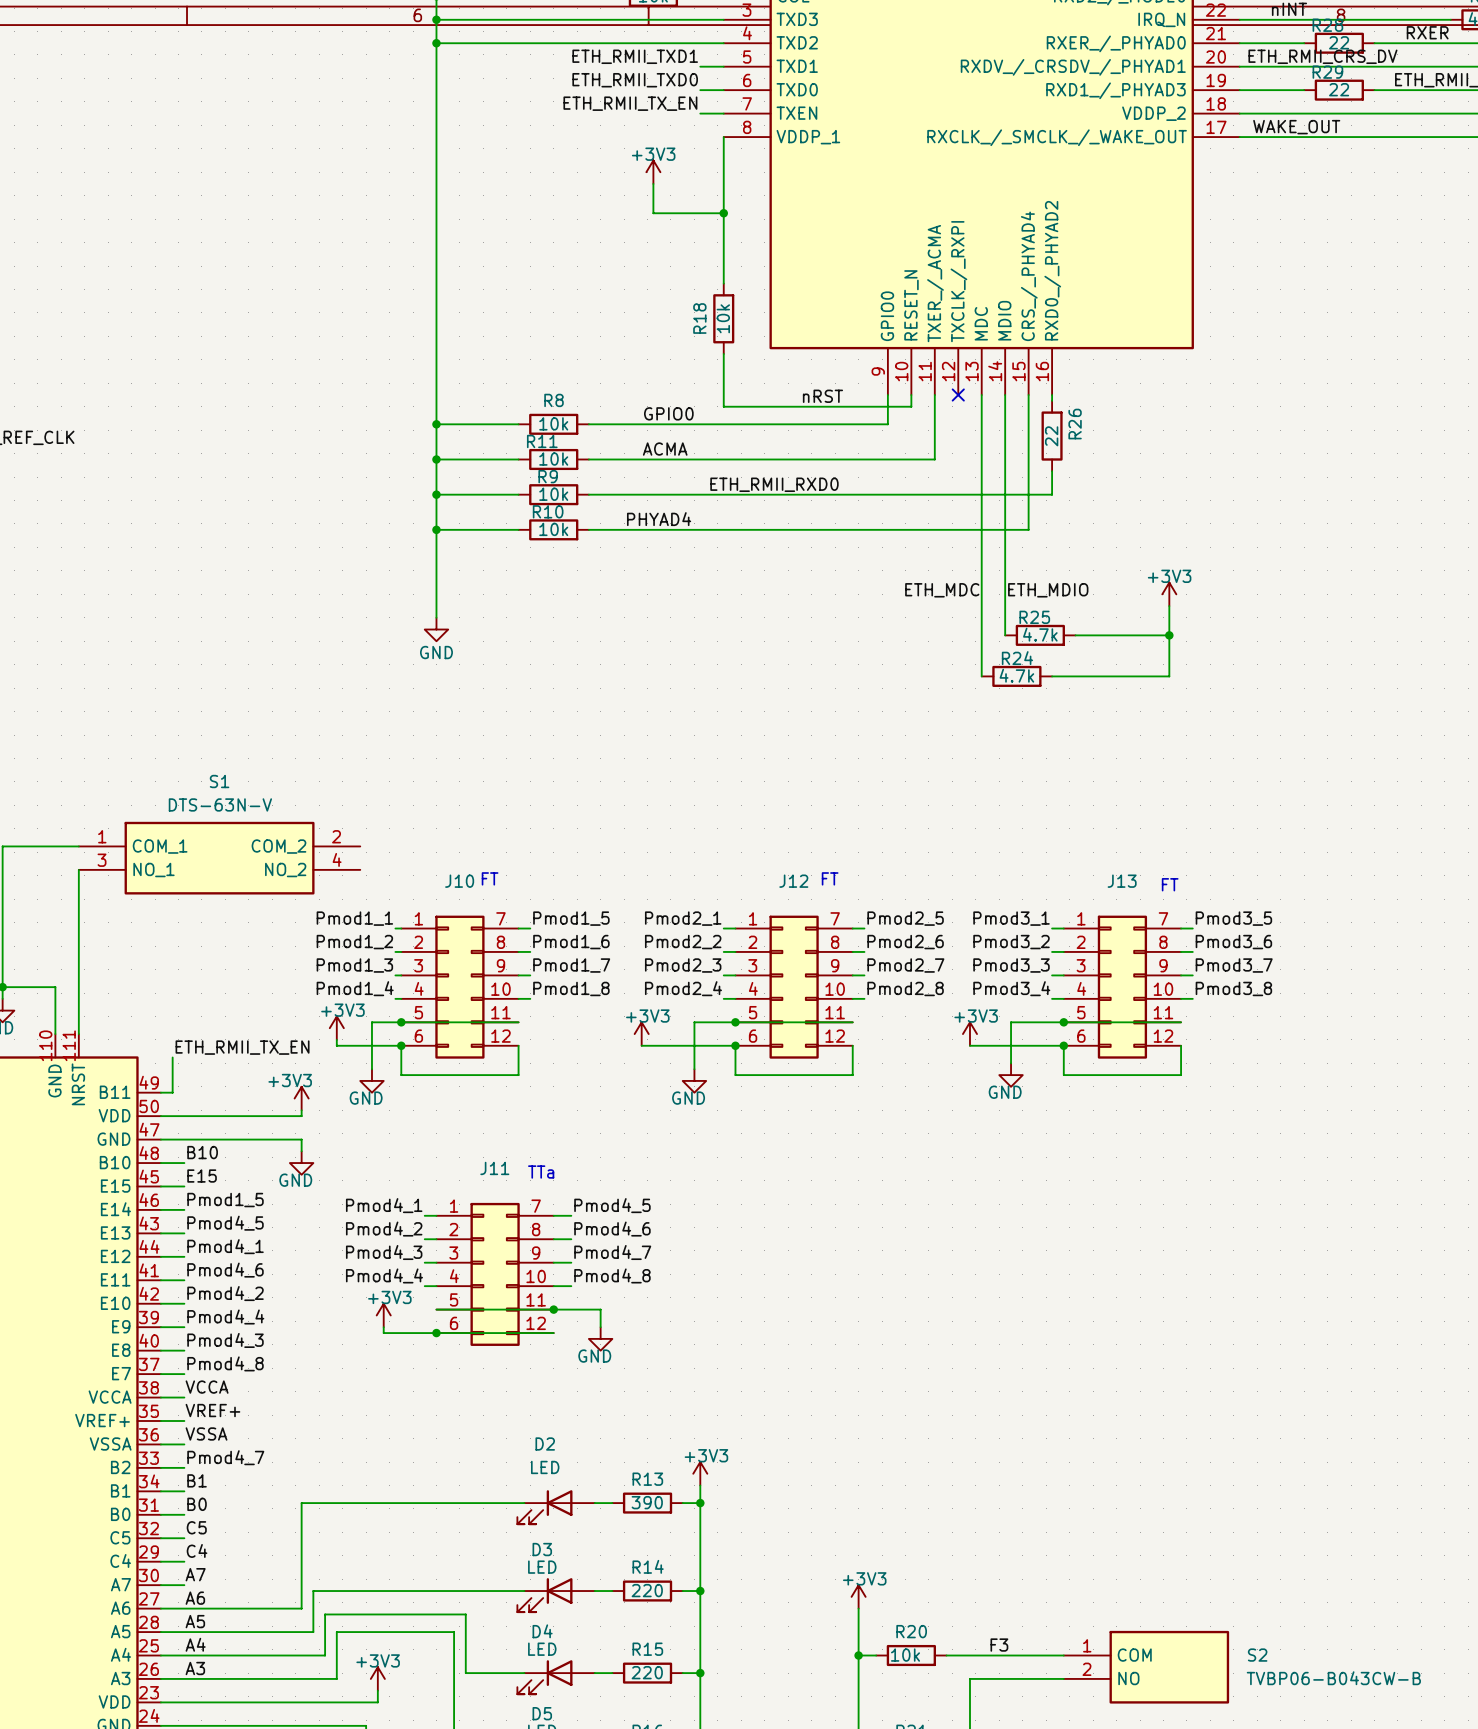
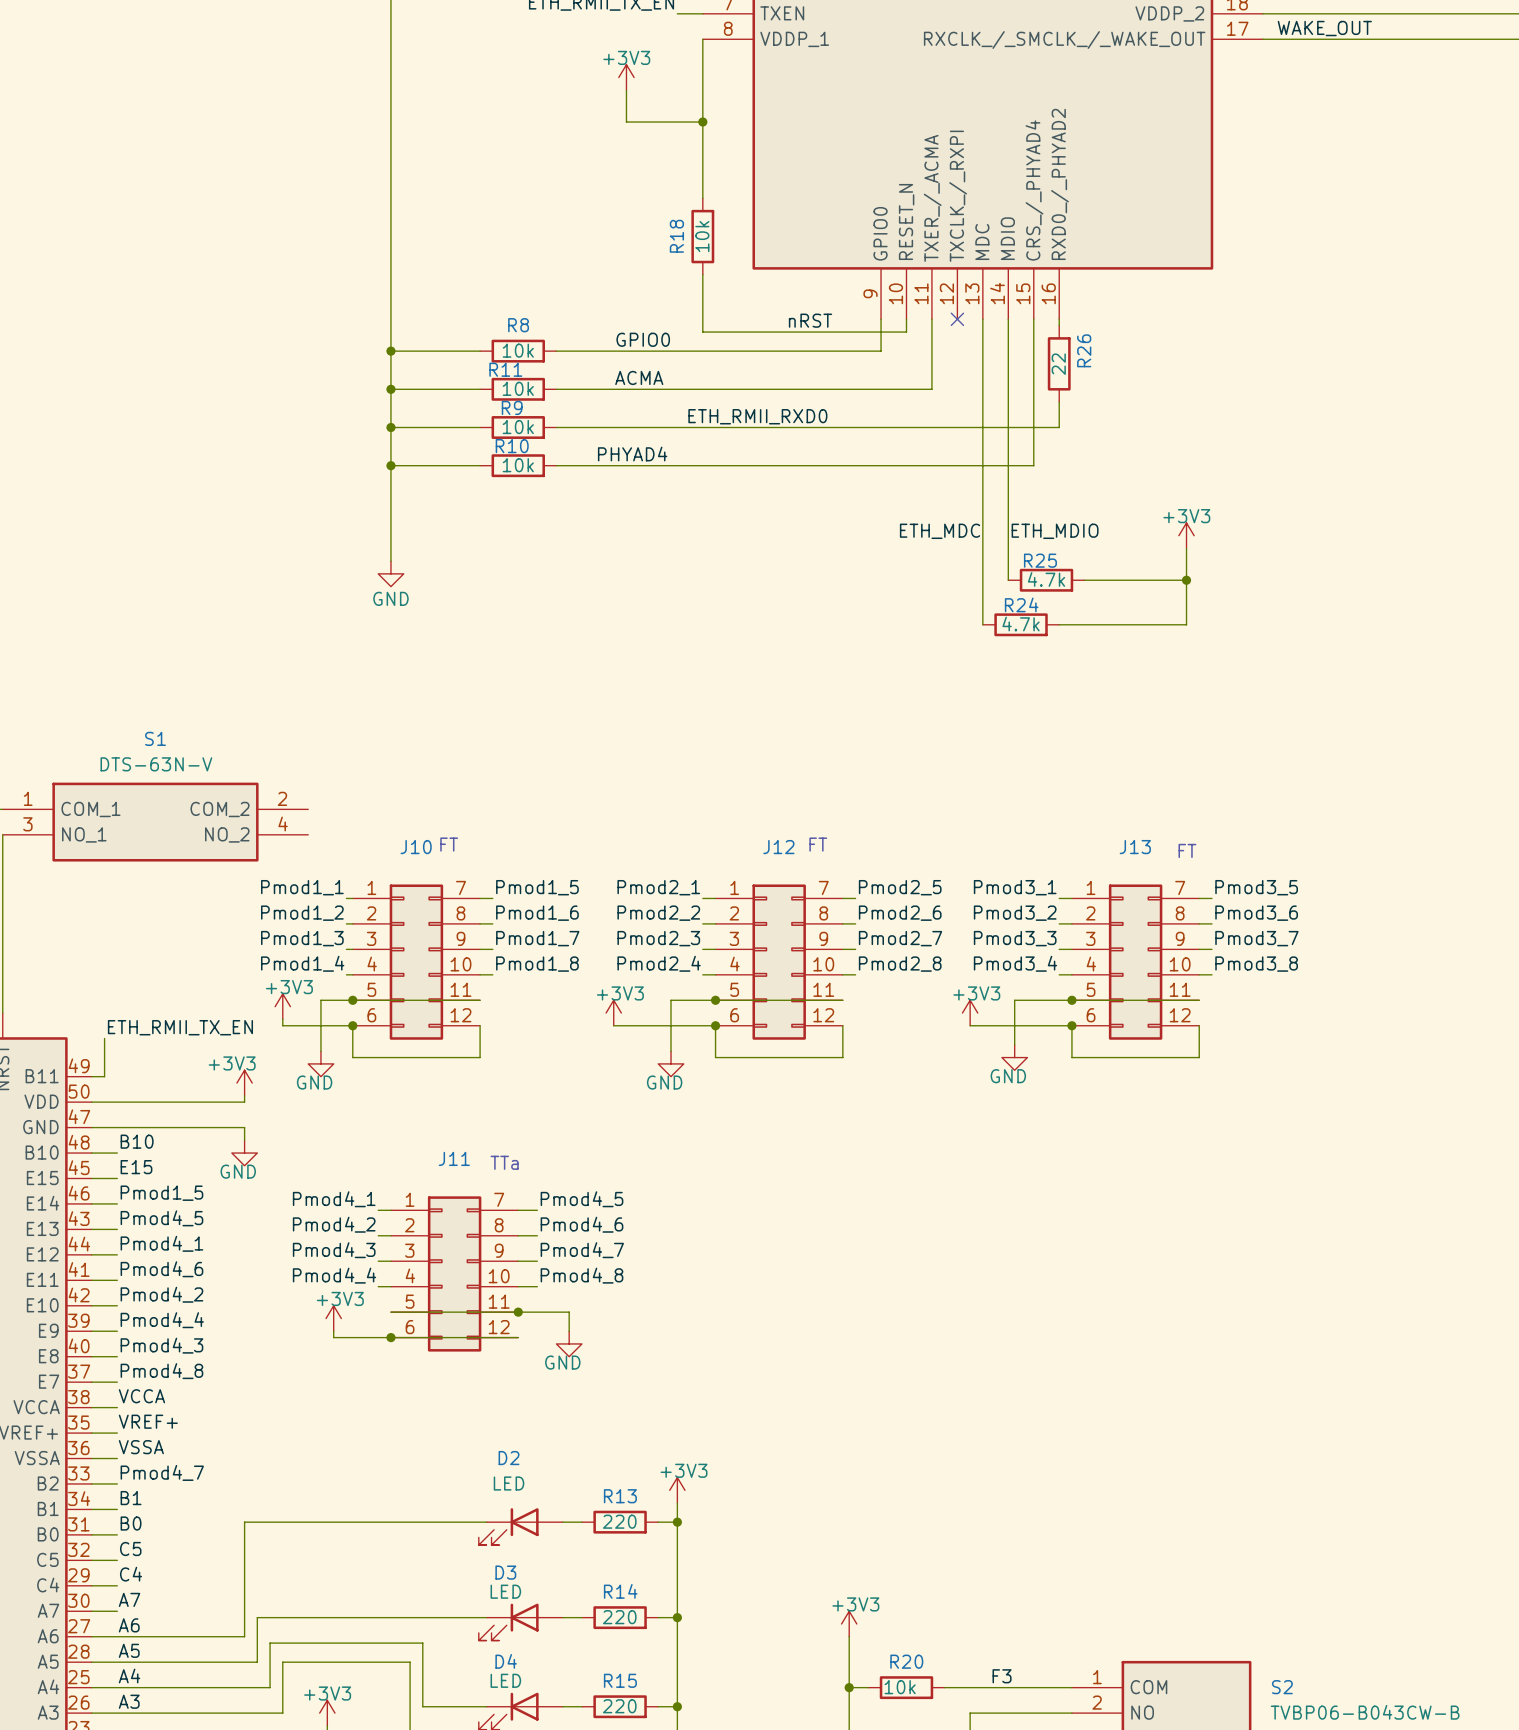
R13 value: 390 (647, 1502) -> 220 (619, 1521)

